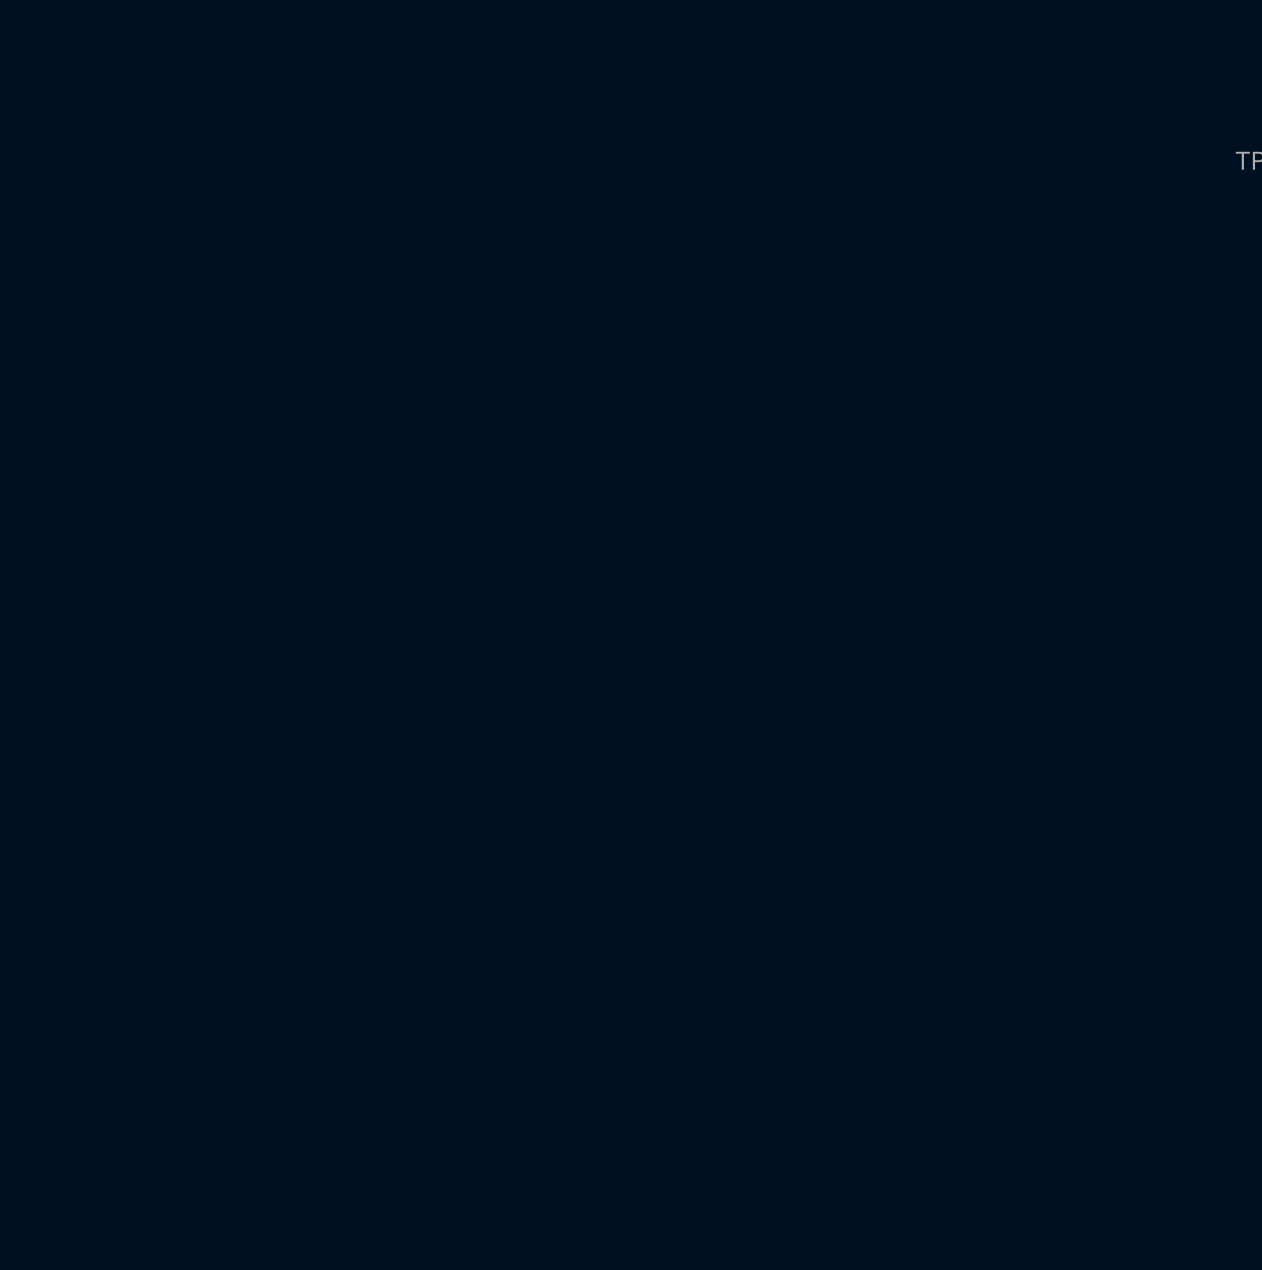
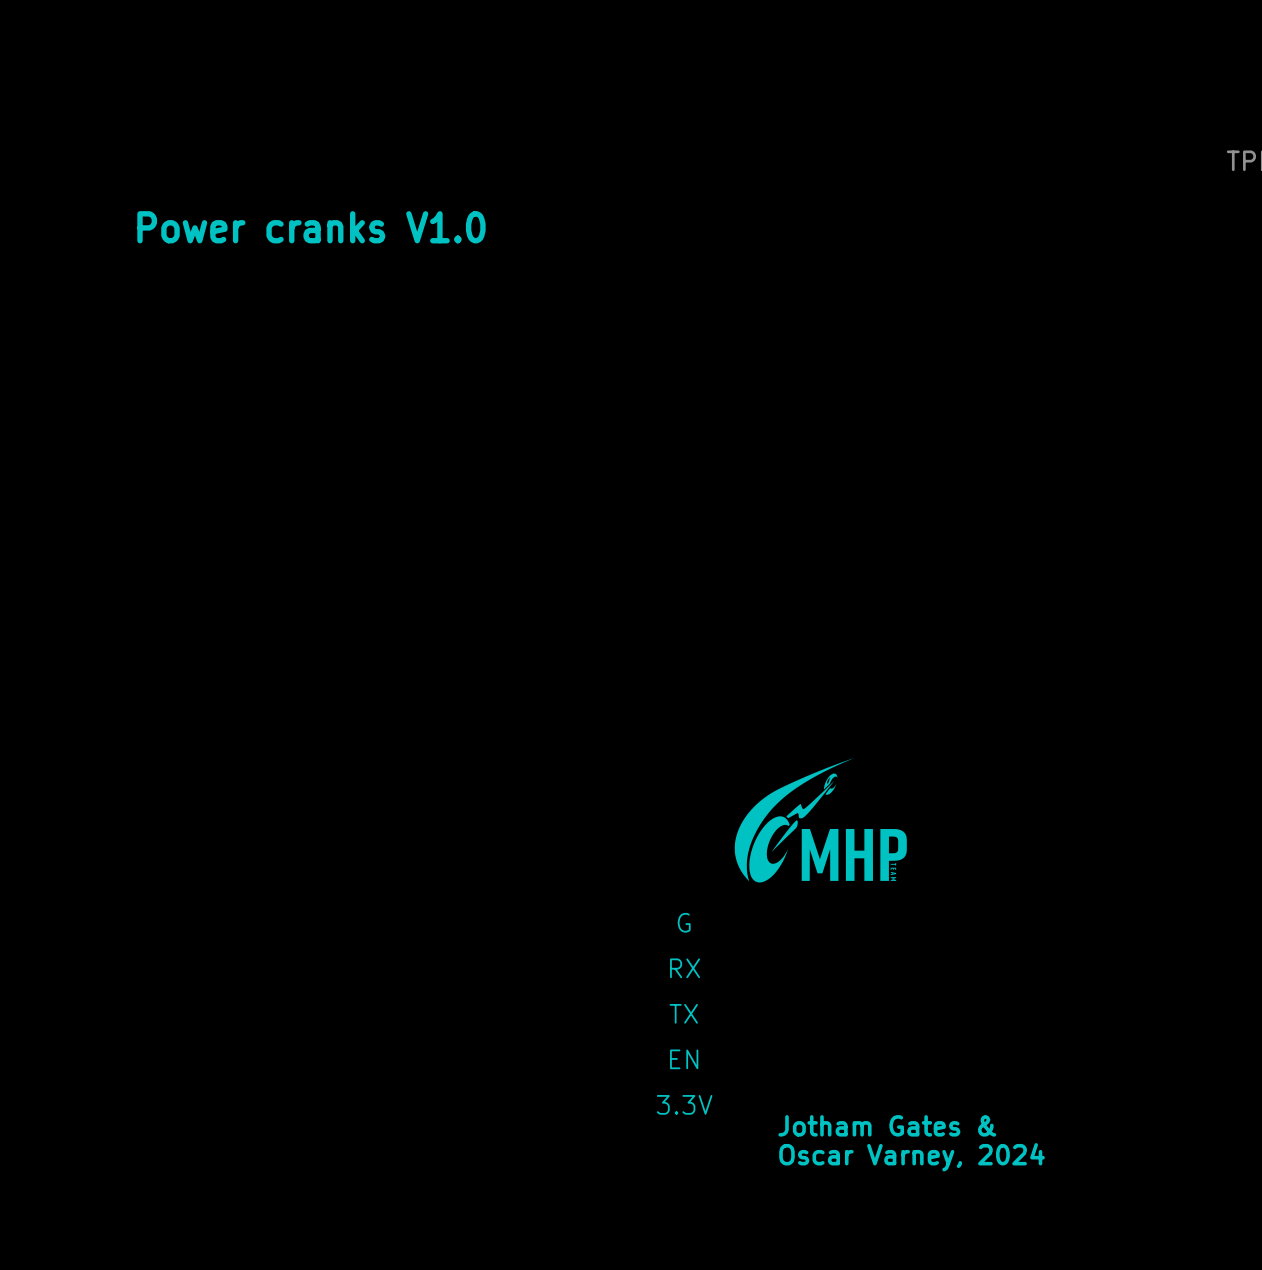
text: none -> Power cranks V1.0 (311, 227)
drawing: none -> [734, 758, 907, 883]
text: none -> G (684, 922)
text: none -> RX (685, 968)
text: none -> TX (683, 1013)
text: none -> EN (684, 1059)
text: none -> 3.3V (684, 1104)
text: none -> Jotham Gates & (887, 1125)
text: none -> Oscar Varney, 2024 (912, 1157)

